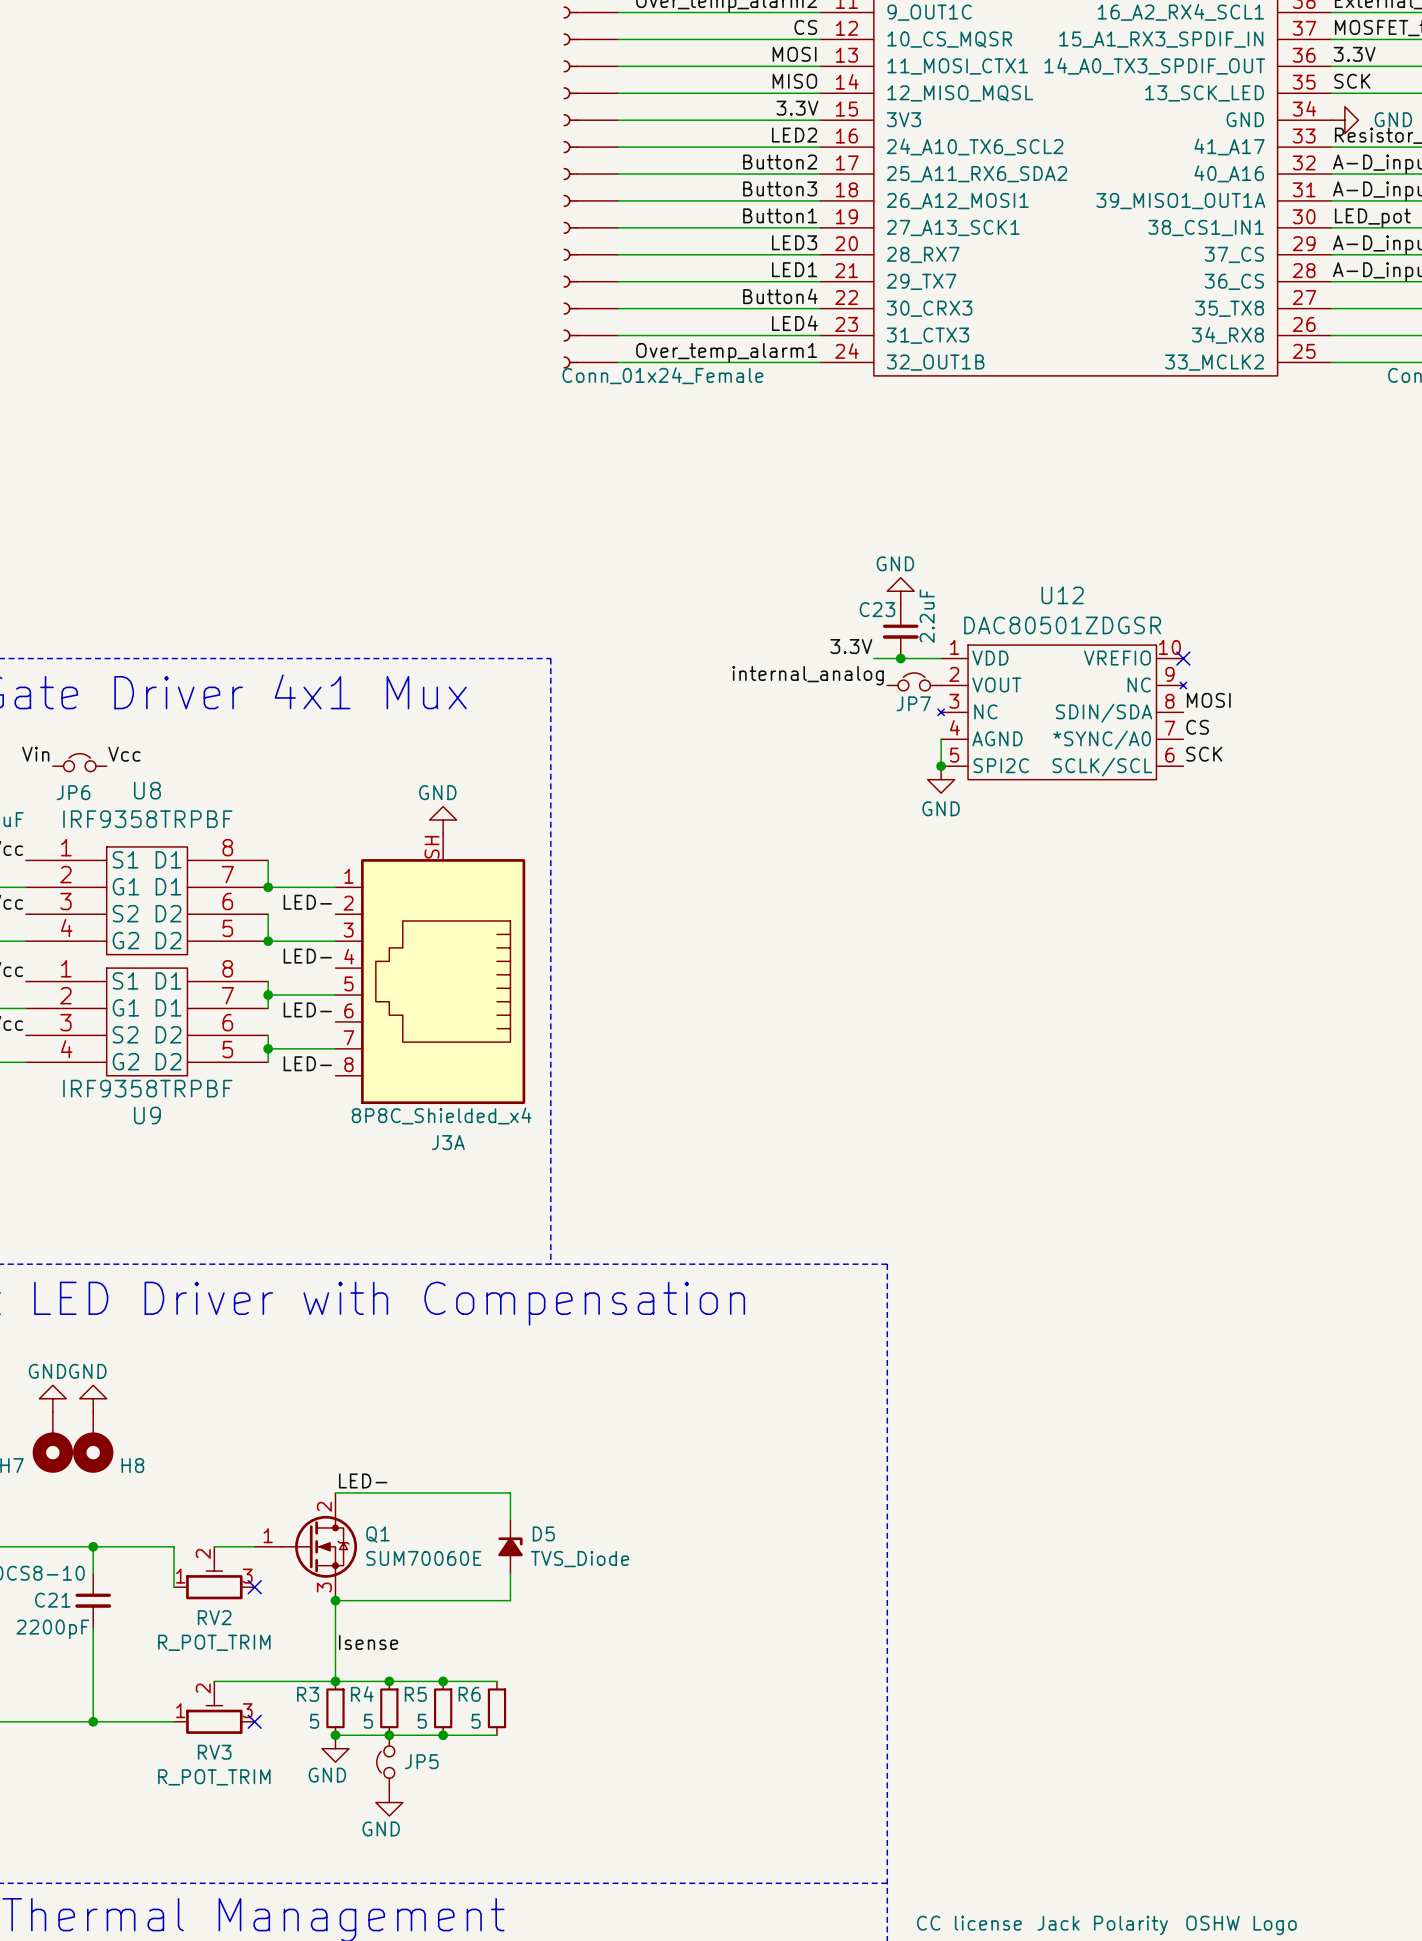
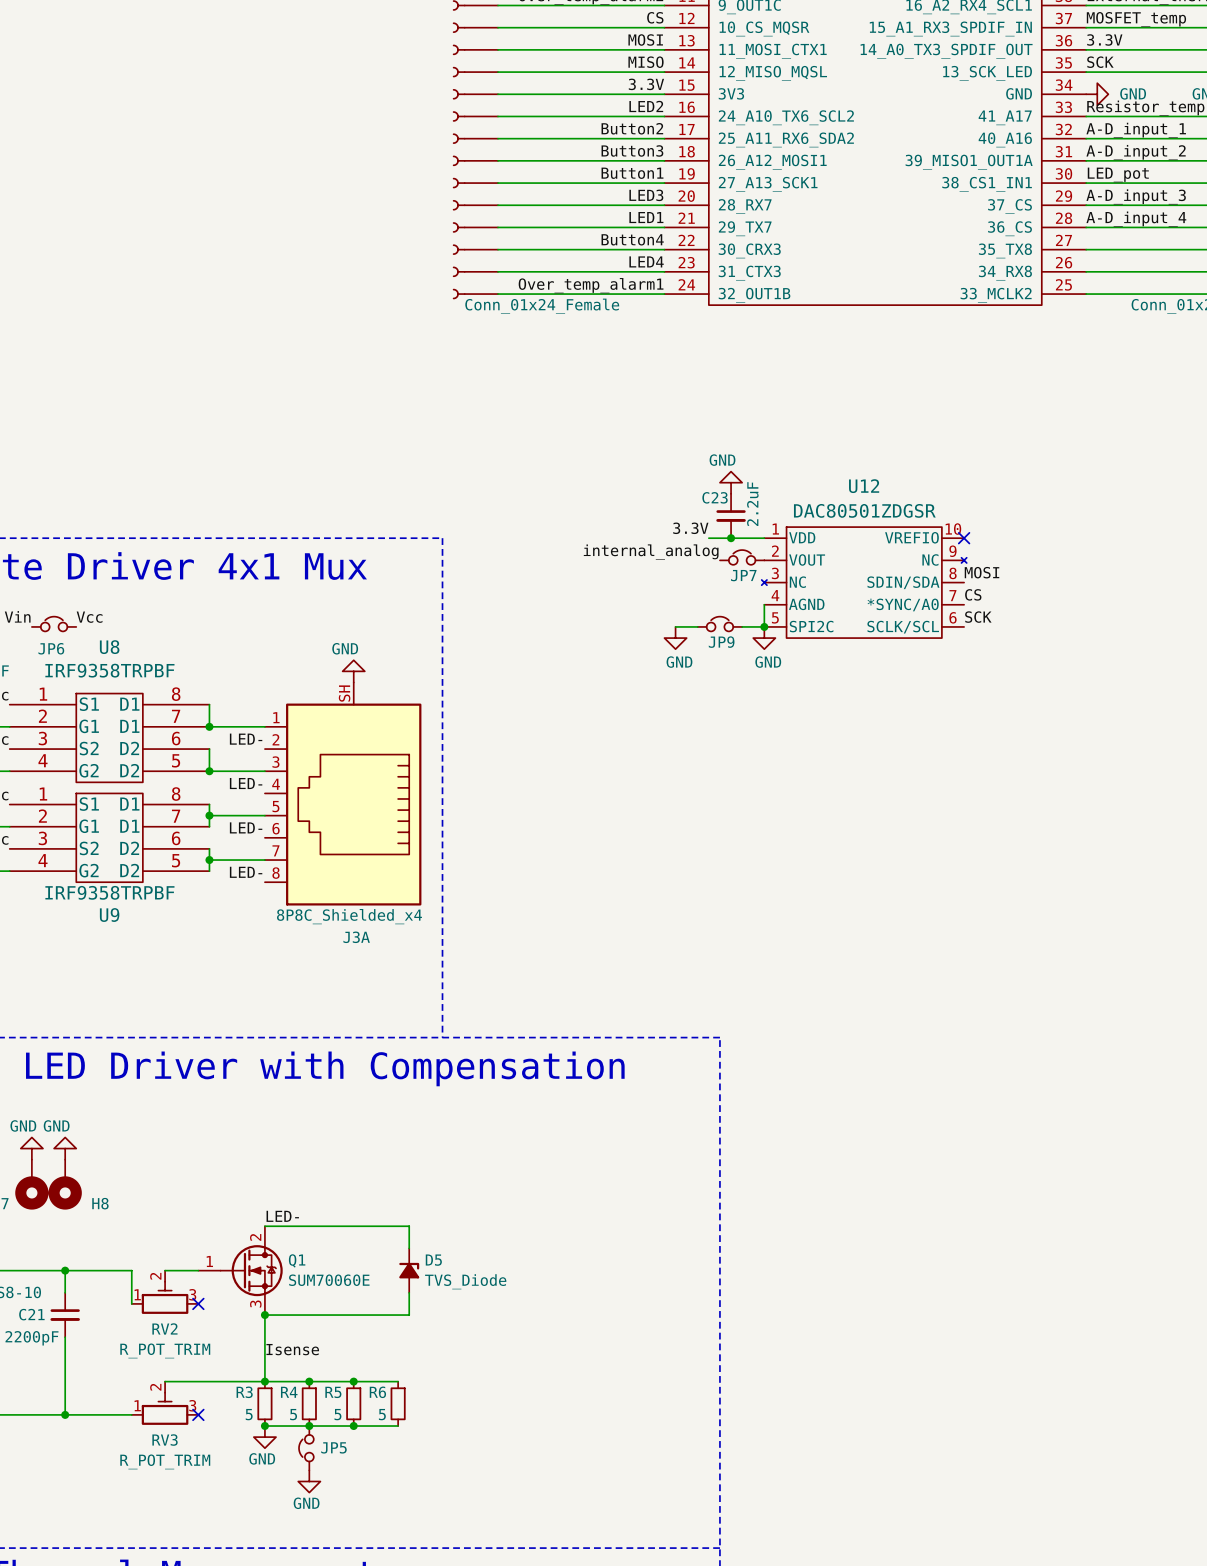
JP9: none -> (719, 624)
wire: none -> (675, 626) (697, 626)
wire: none -> (742, 626) (764, 626)
power symbol: none -> GND (675, 638)

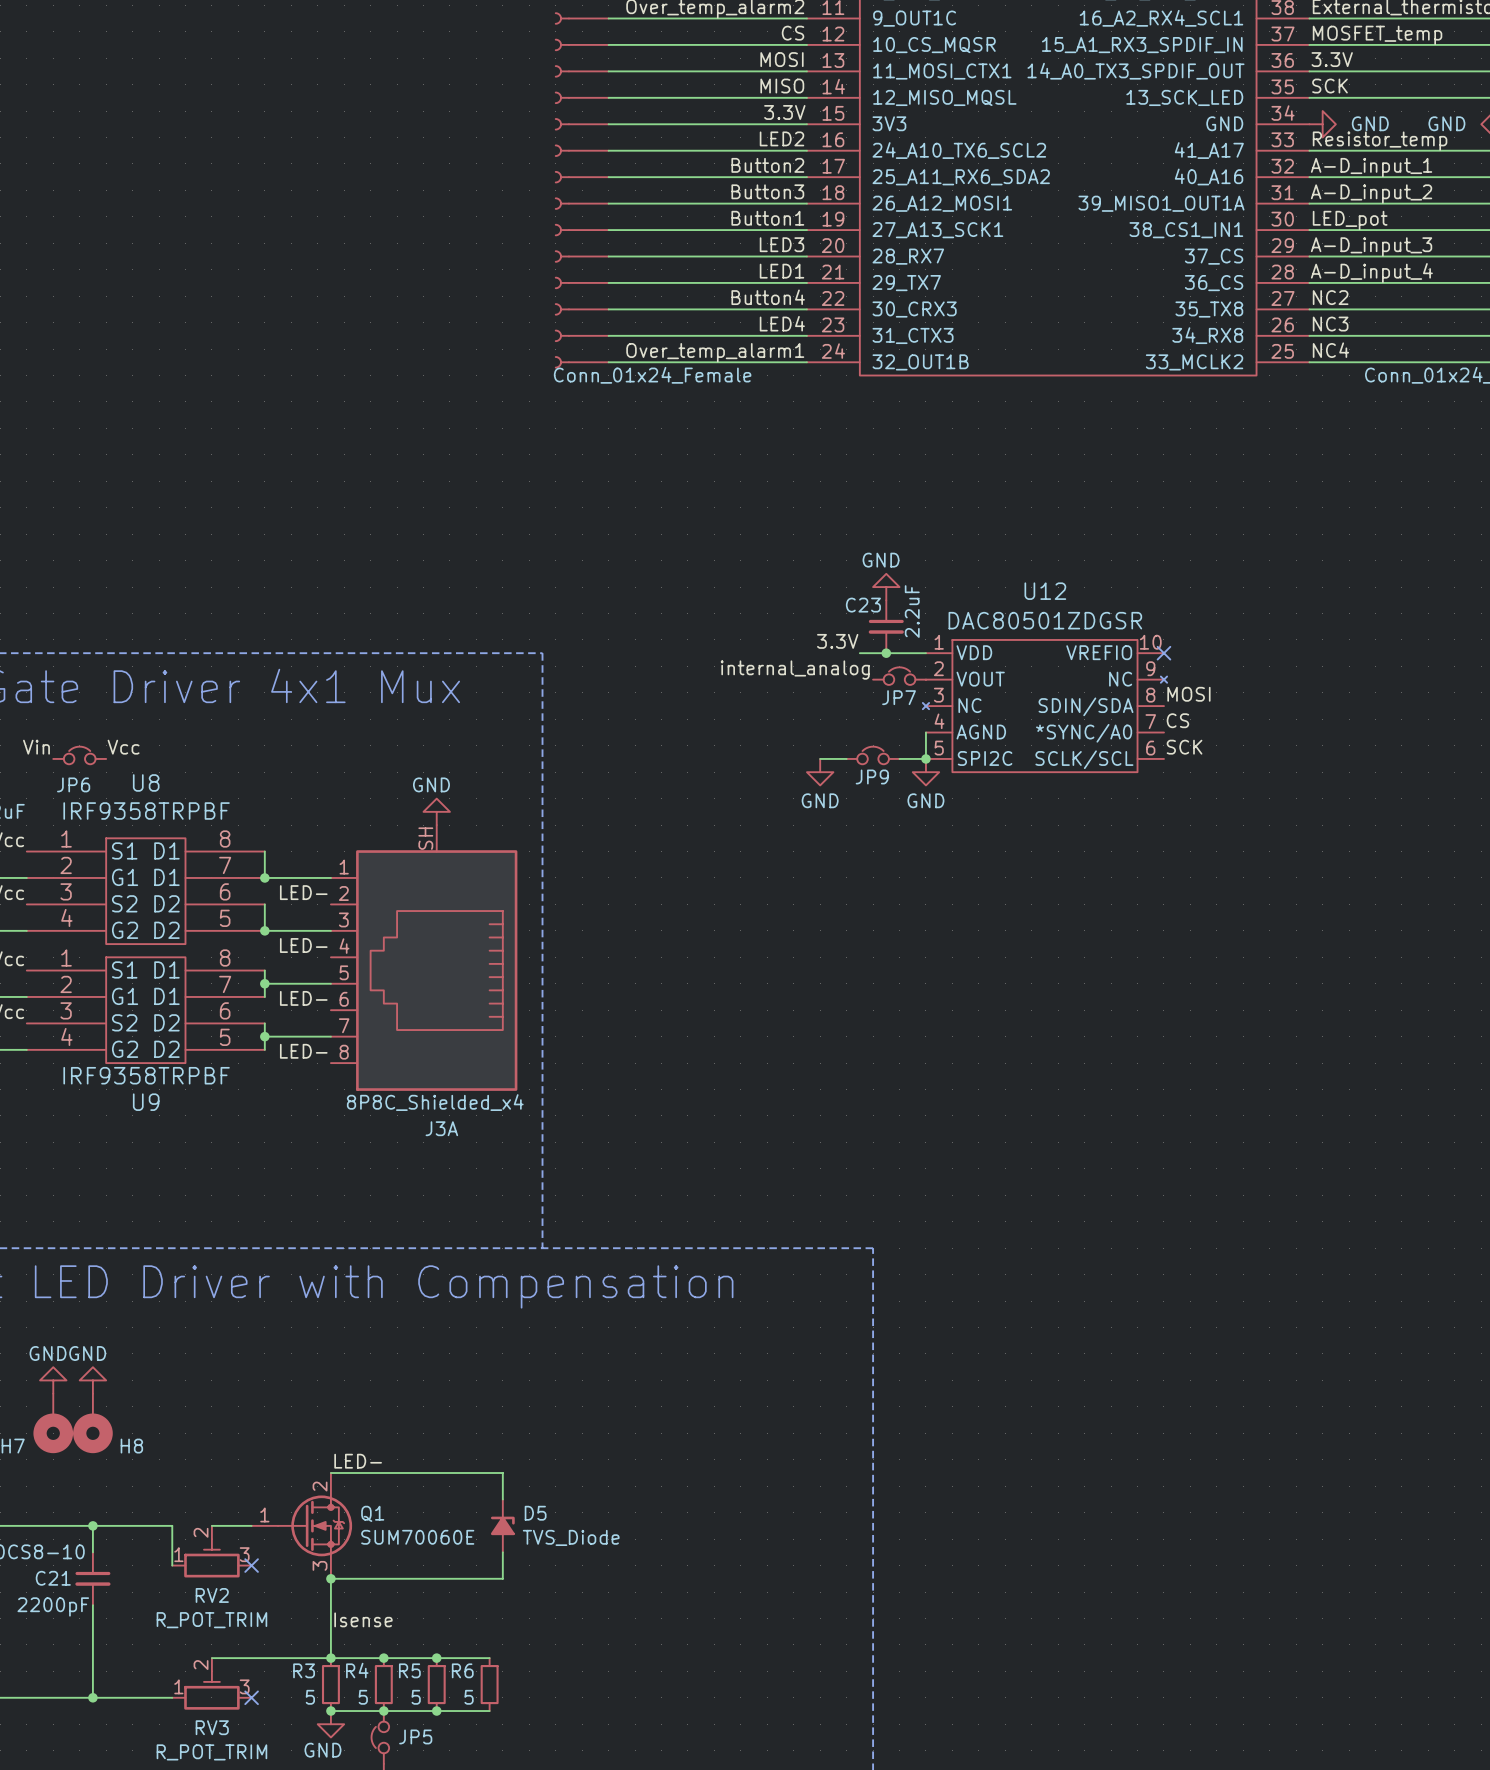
label: none -> NC2 (1330, 297)
label: none -> NC3 (1330, 324)
label: none -> NC4 (1330, 350)

